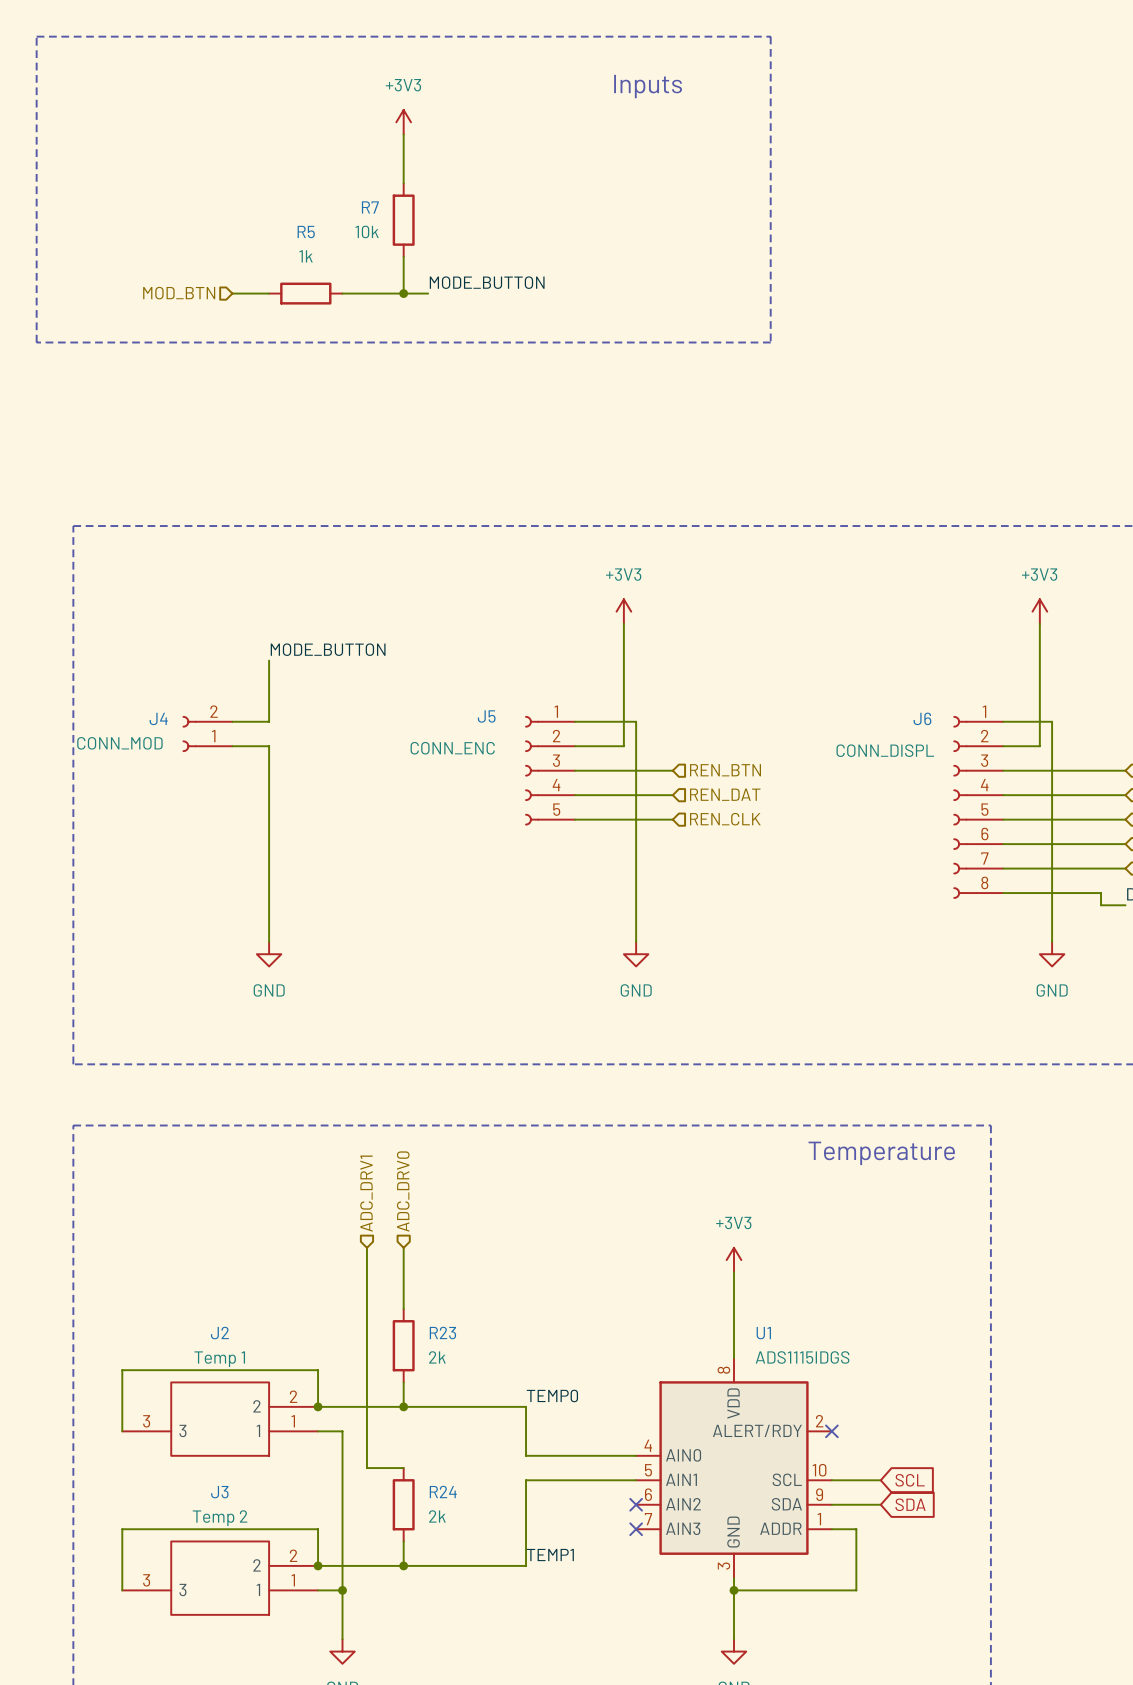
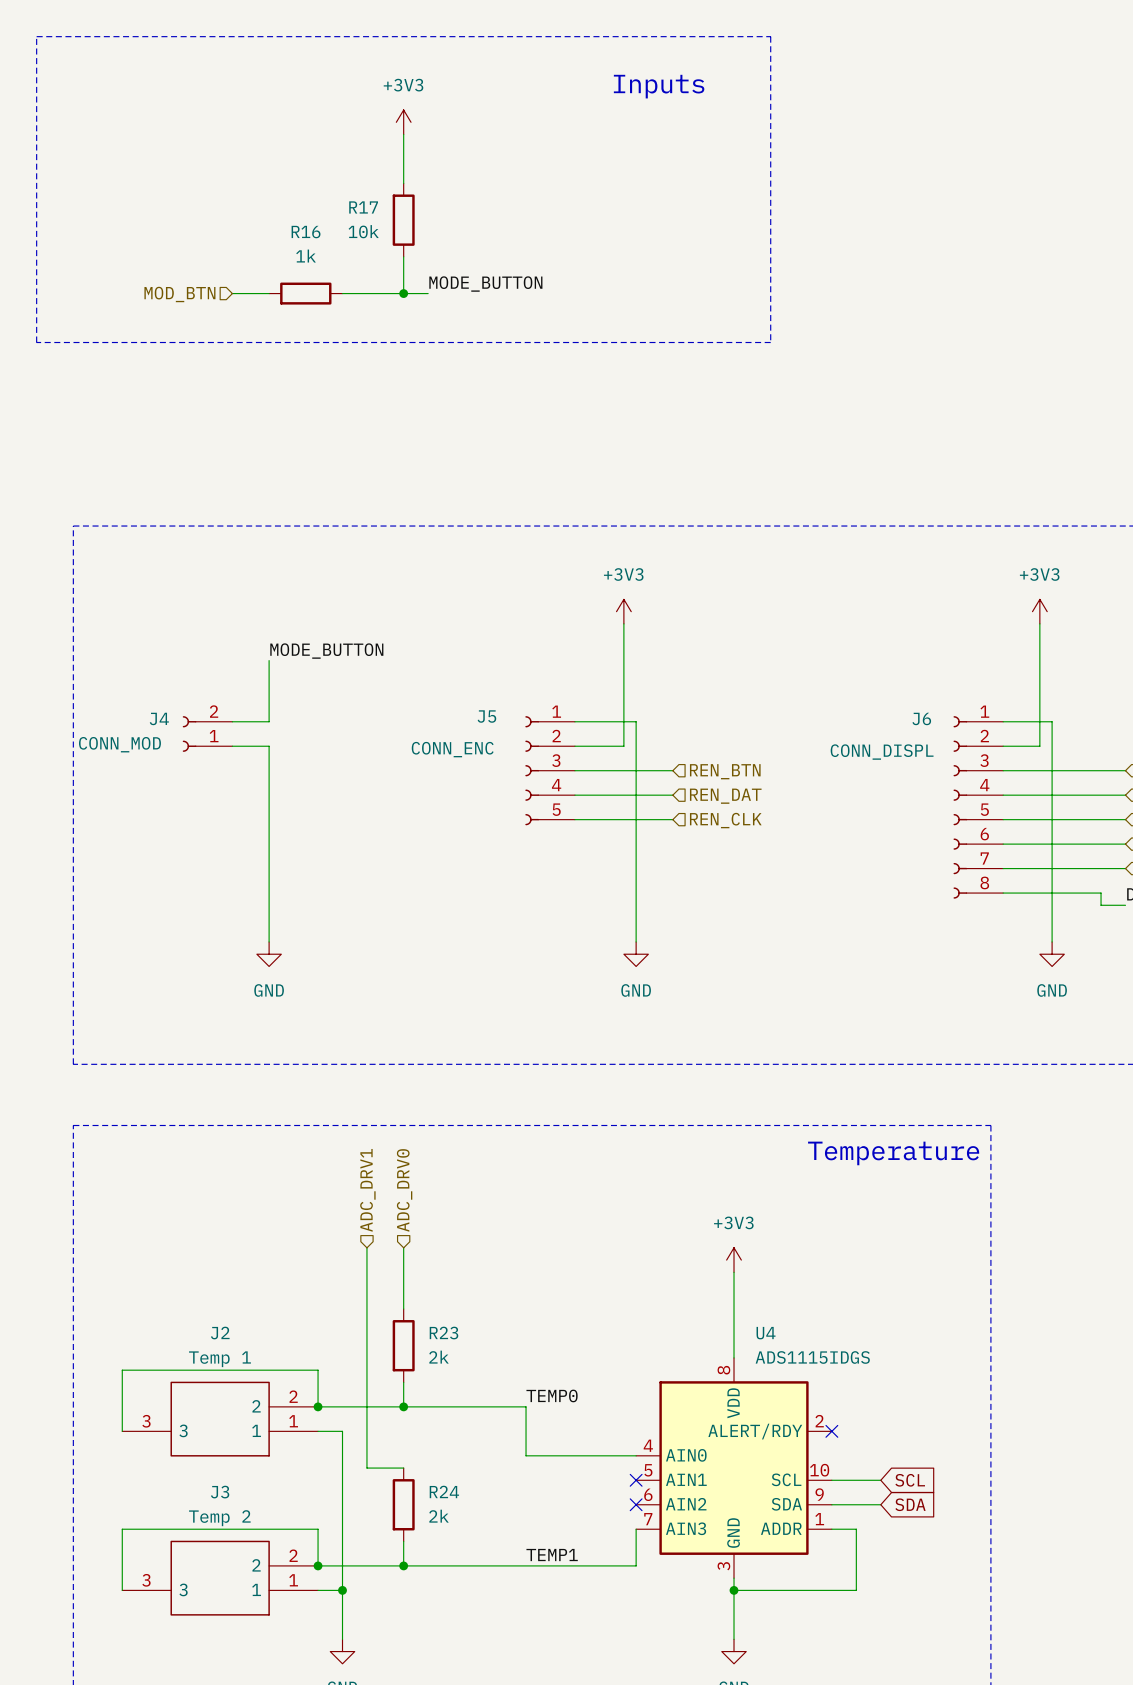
R7 name: R7 (370, 207) -> R17 (363, 207)
R5 name: R5 (306, 232) -> R16 (306, 232)
U1 name: U1 (763, 1333) -> U4 (766, 1333)
wire: (636, 1480) (526, 1480) (526, 1565) -> (636, 1529) (636, 1565) (526, 1565)
no-connect mark position: (636, 1529) -> (636, 1480)

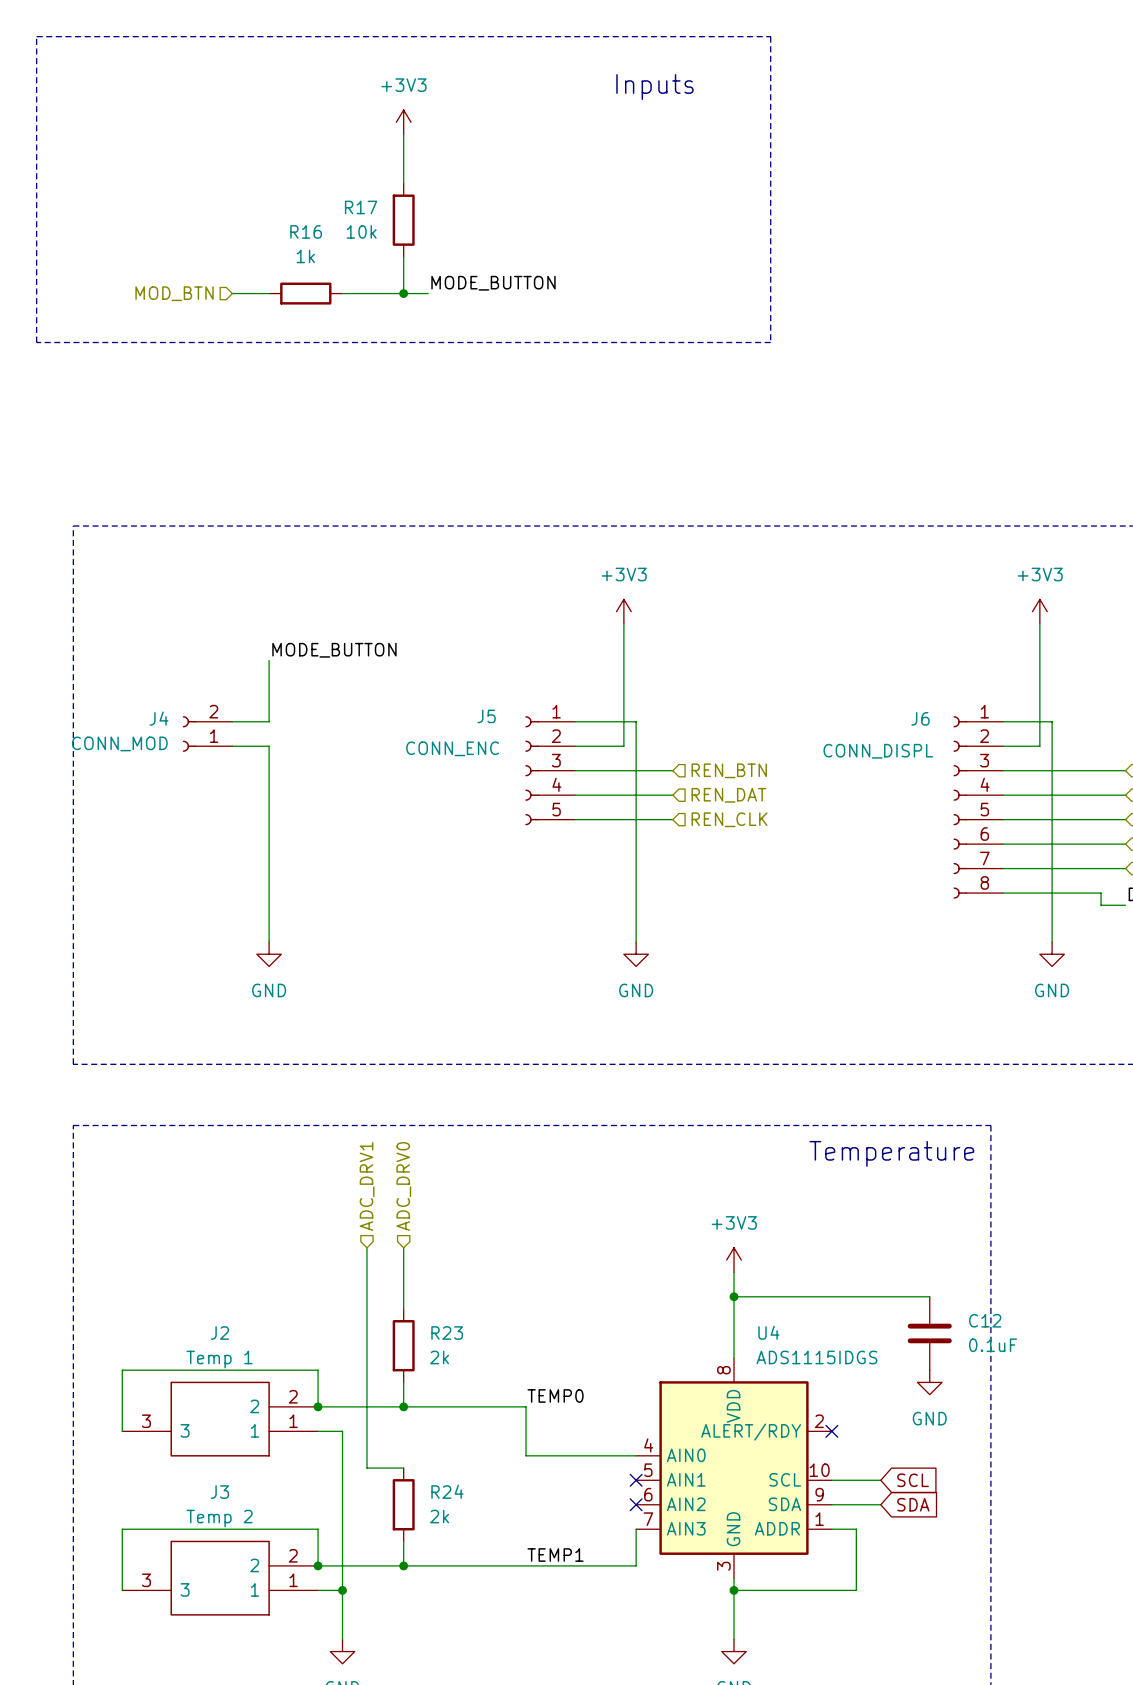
wire: none -> (734, 1296) (929, 1296)
junction: none -> (734, 1296)
C12: none -> 0.1uF (929, 1333)
power symbol: none -> GND (929, 1382)

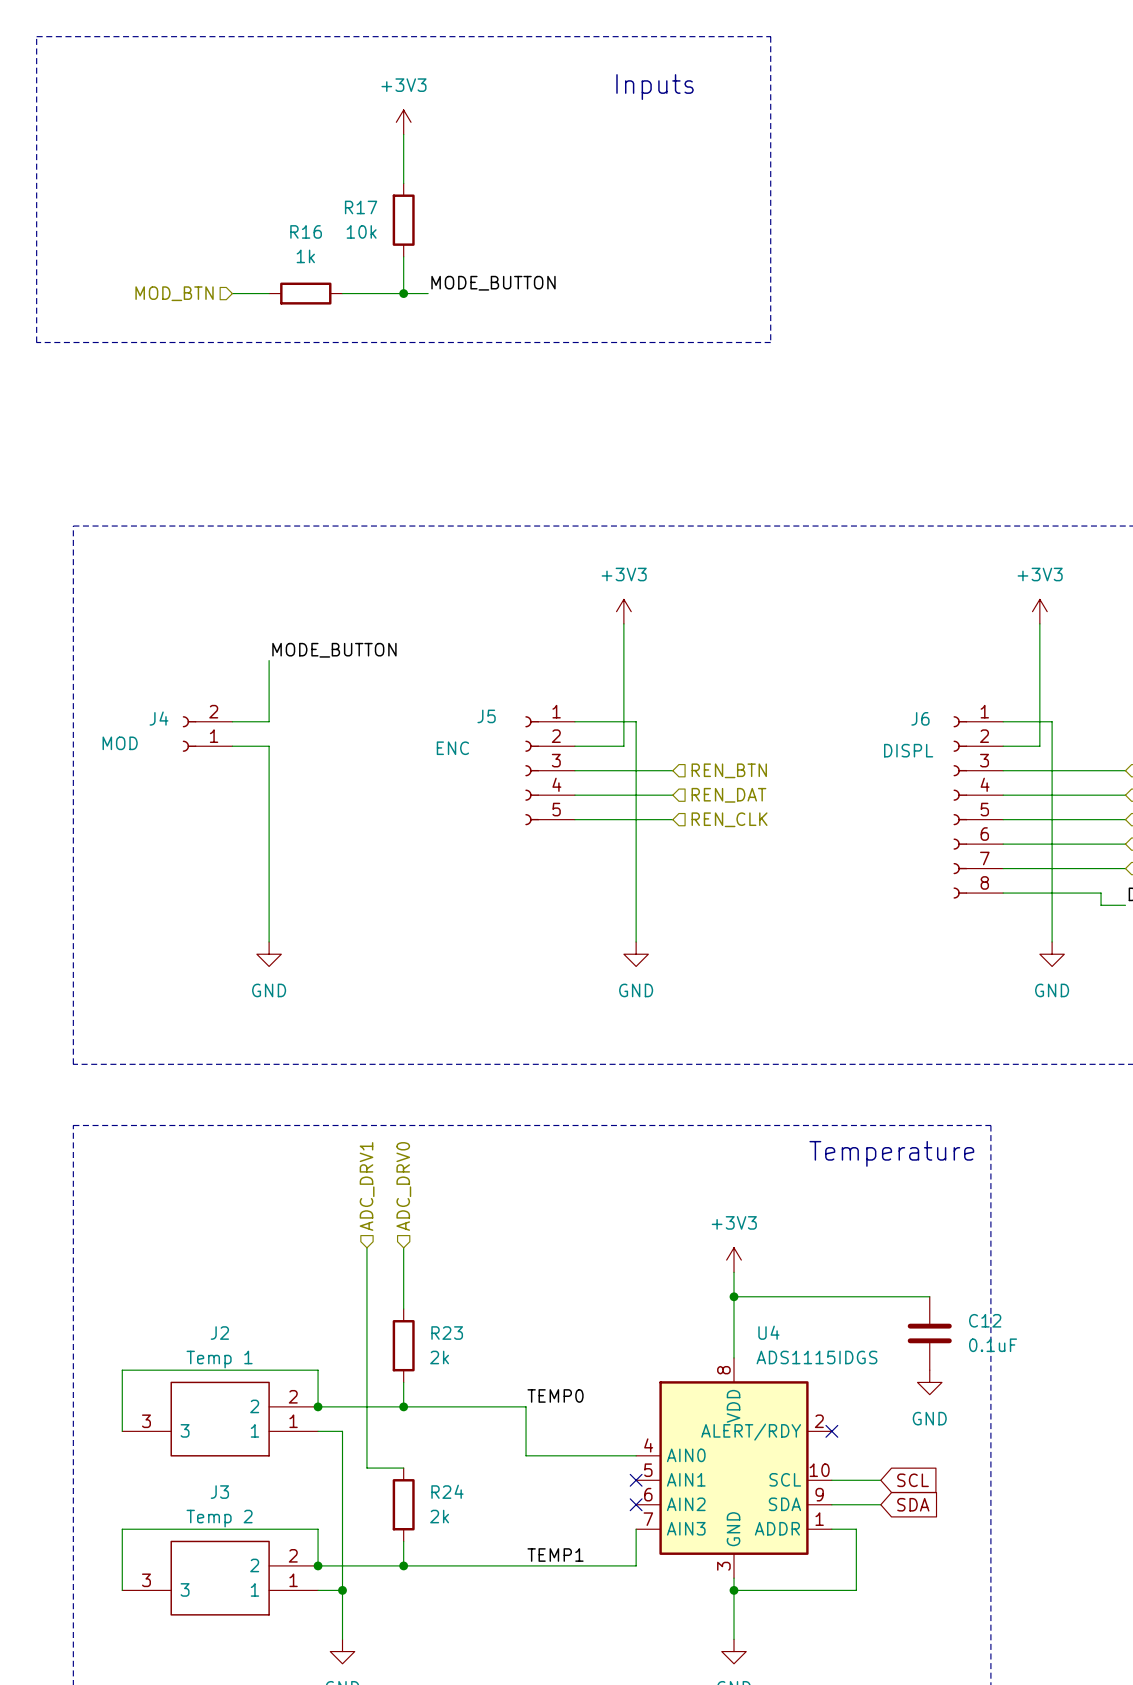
J4 value: CONN_MOD (119, 743) -> MOD (120, 743)
J5 value: CONN_ENC (452, 748) -> ENC (452, 748)
J6 value: CONN_DISPL (878, 751) -> DISPL (908, 750)

